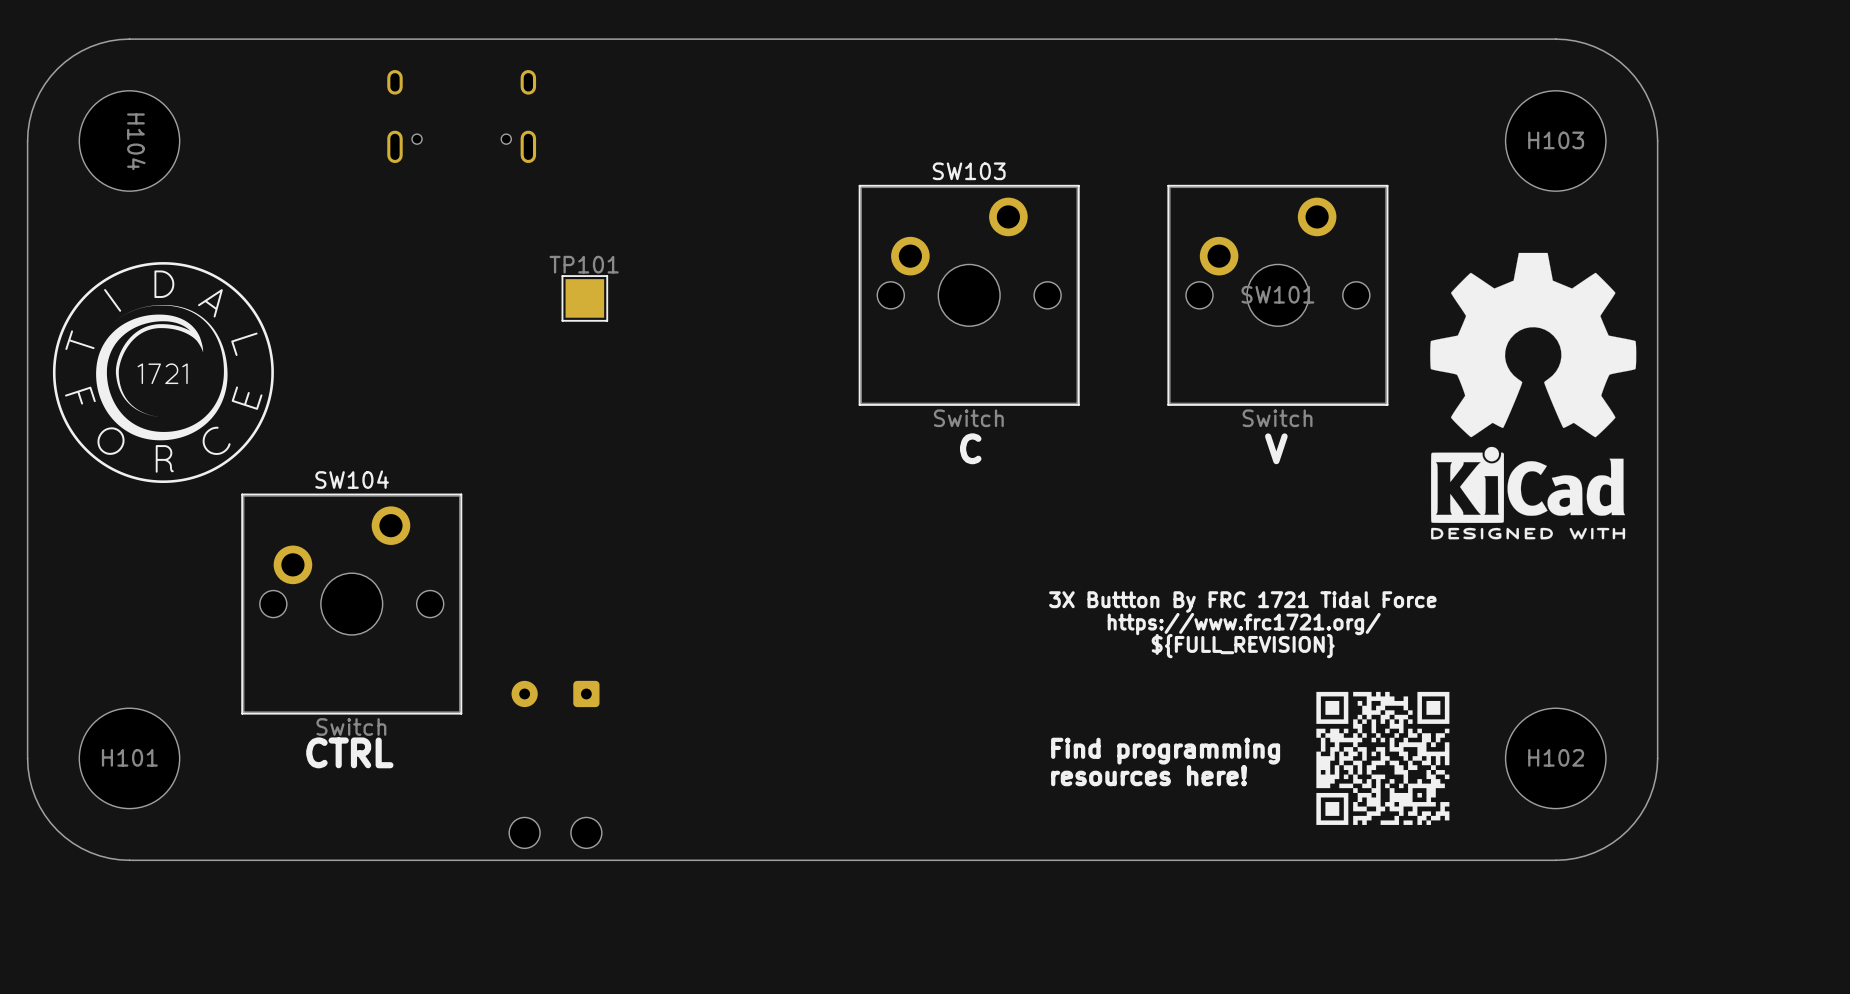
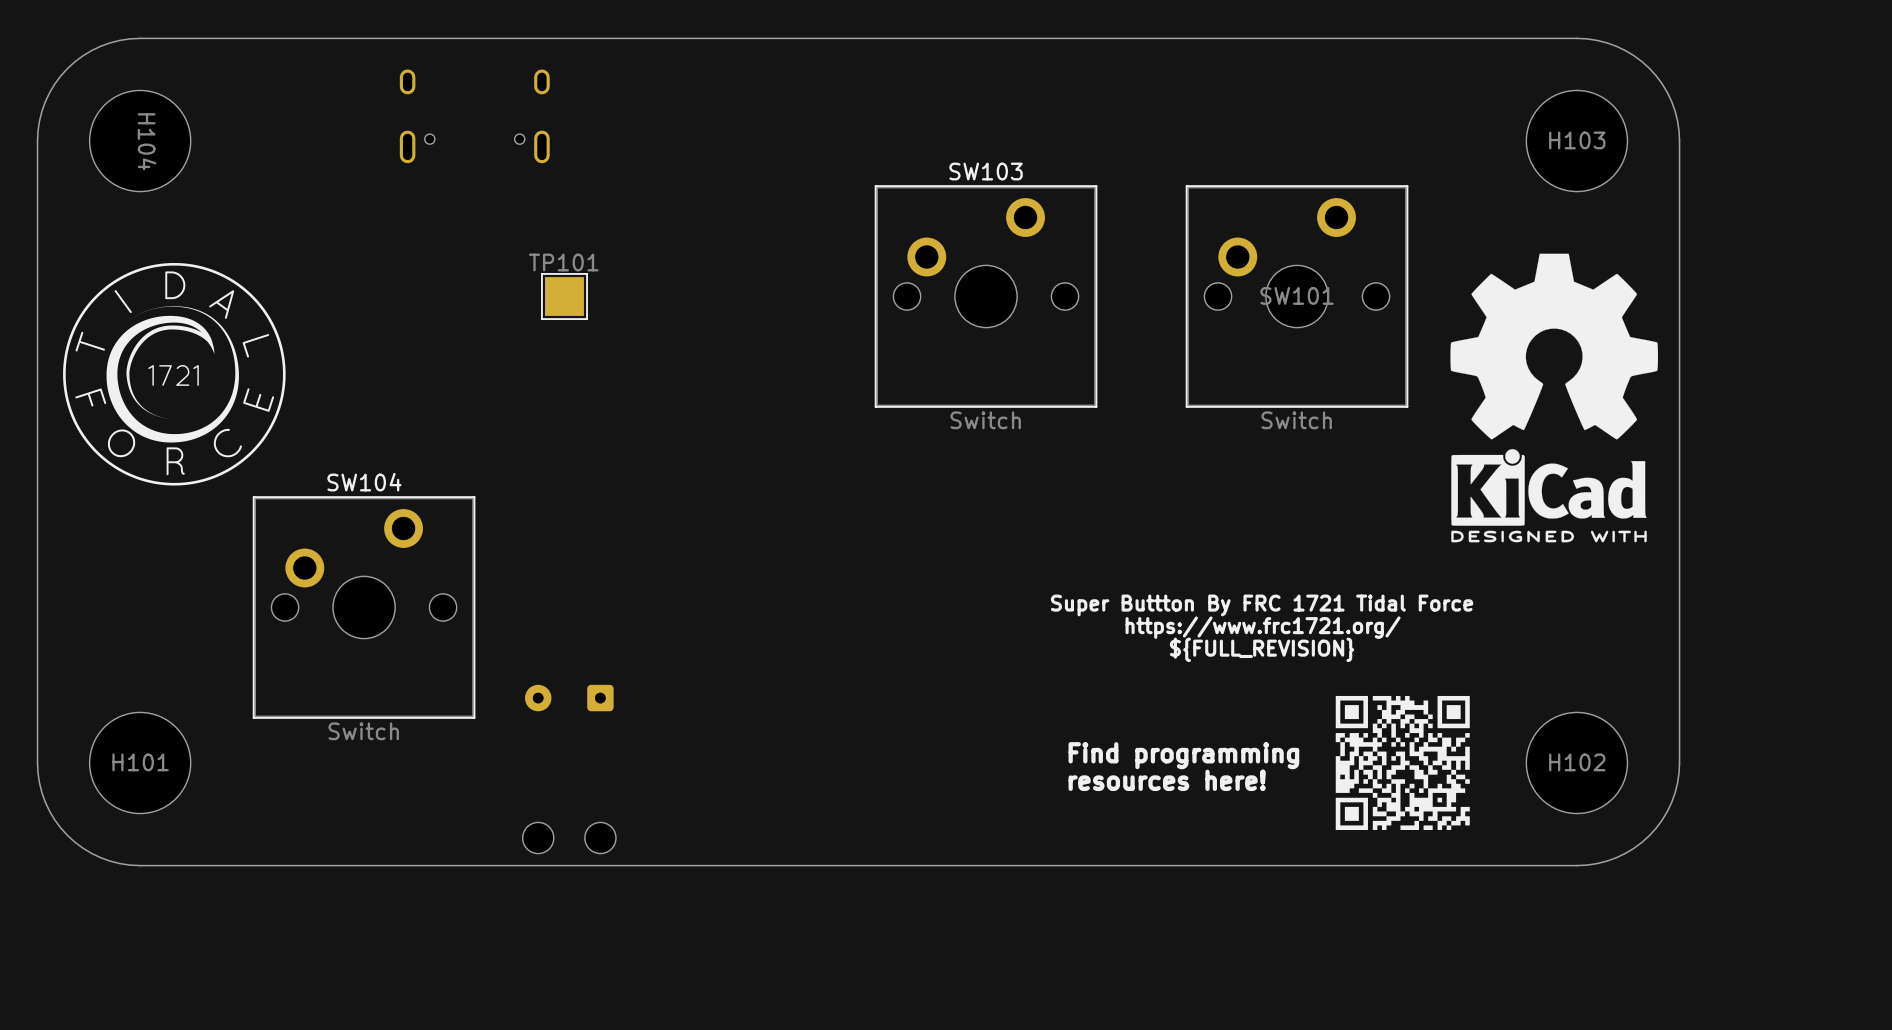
TP101 position: (584, 298) -> (564, 296)
text: C (970, 448) -> none
text: V (1276, 448) -> none
text: 3X Buttton By FRC 1721 Tidal Force (1242, 602) -> Super Buttton By FRC 1721 Tidal Force (1262, 605)
text: CTRL (349, 752) -> none

